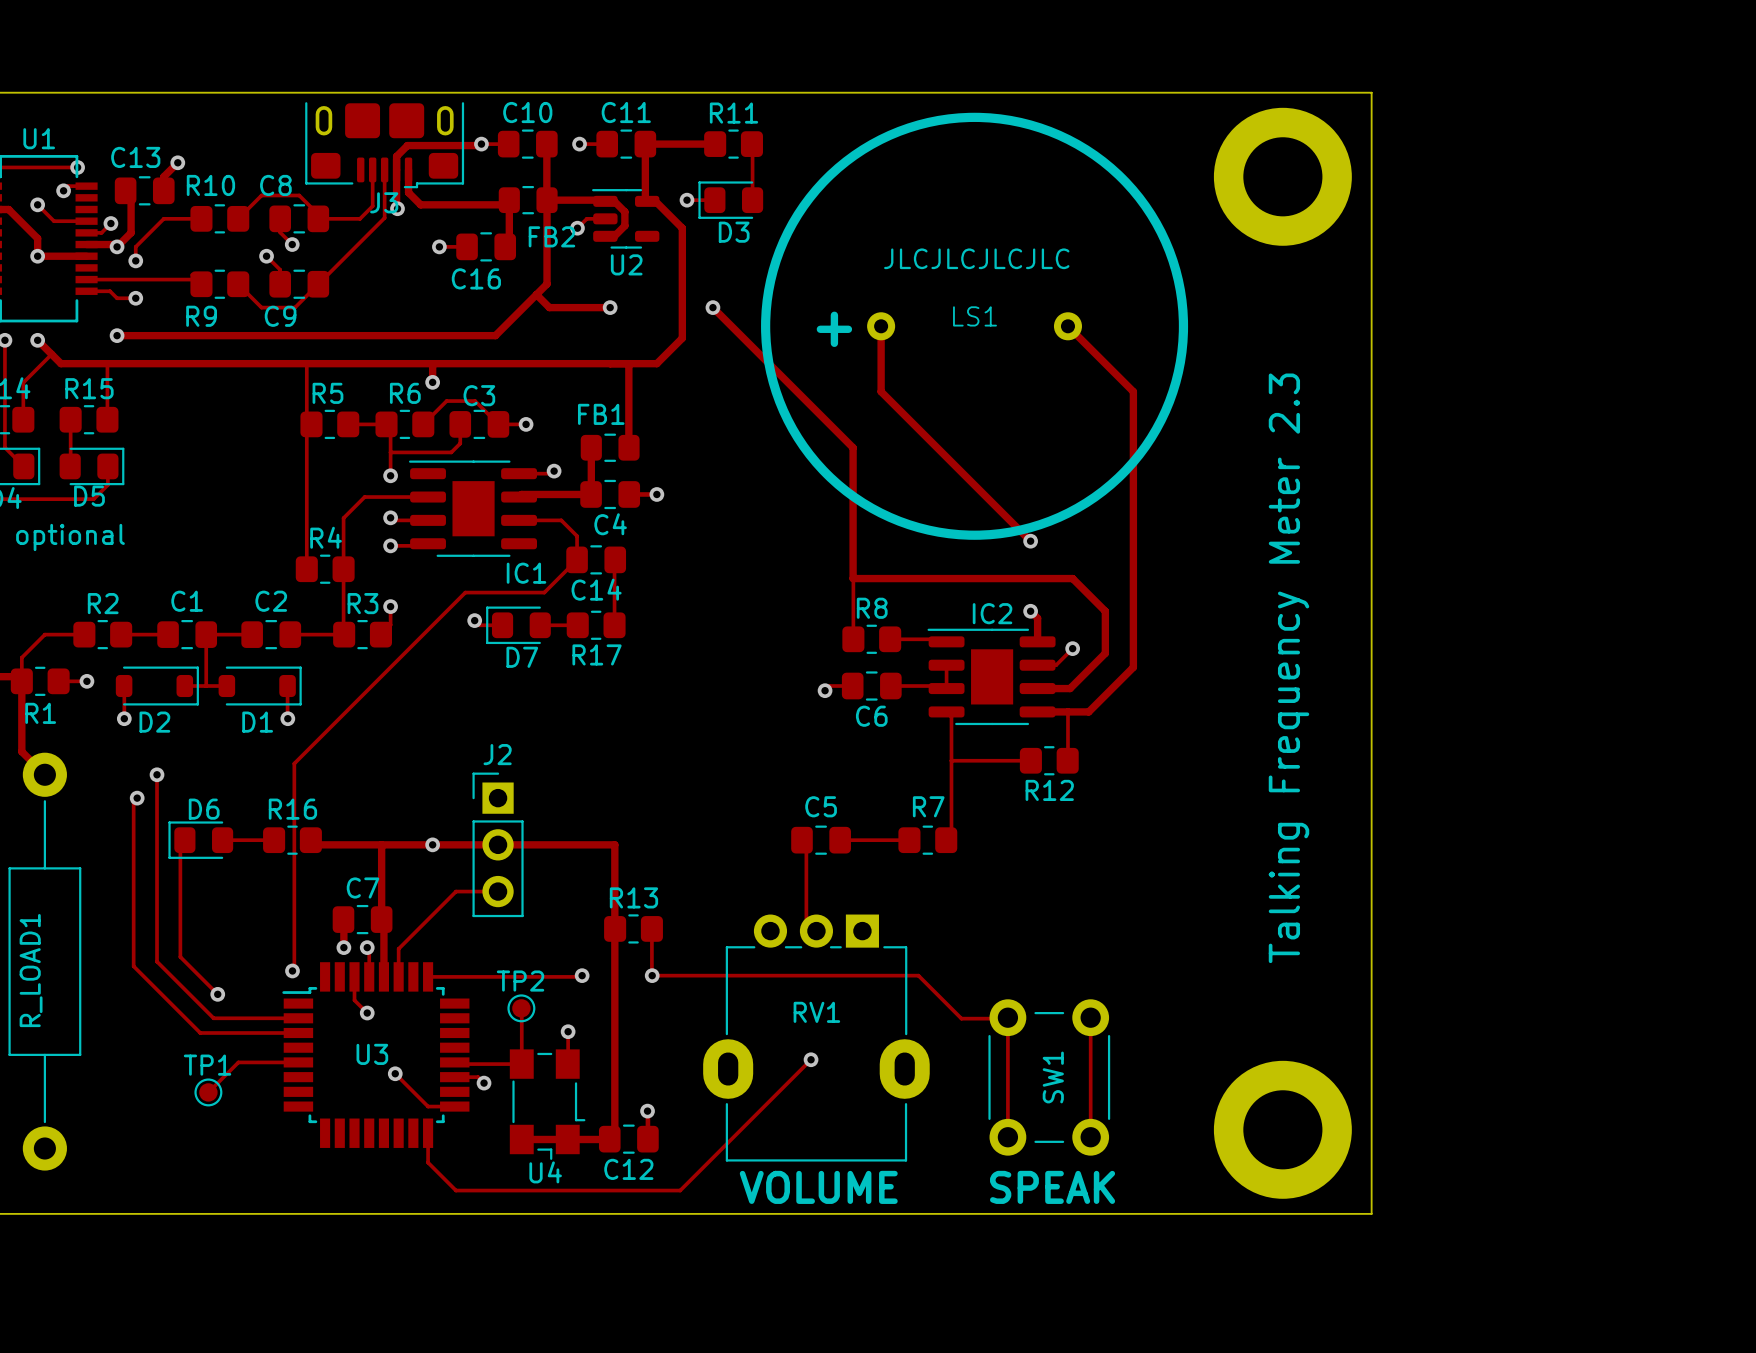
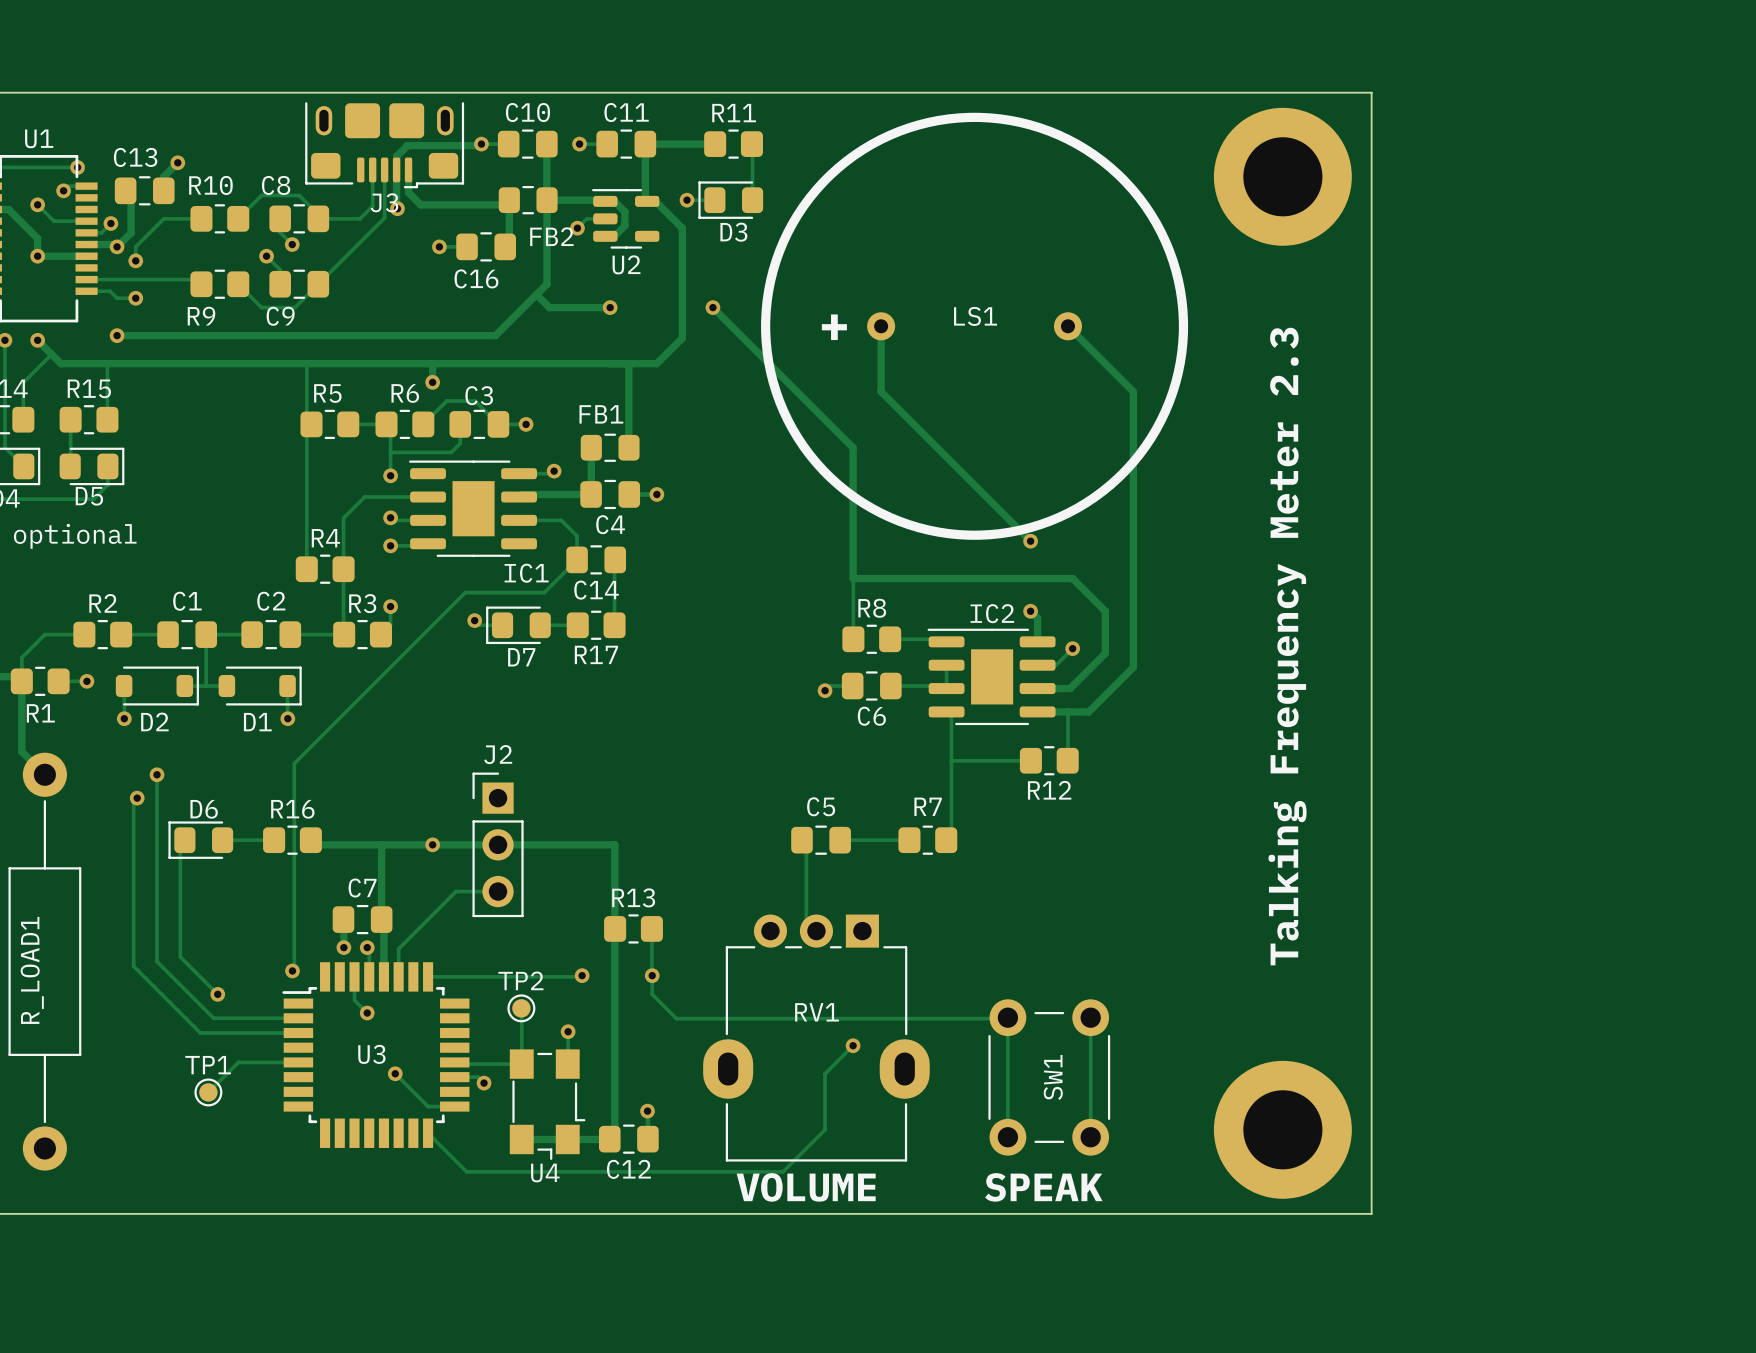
text: JLCJLCJLCJLC (976, 258) -> none
track: (652, 975) (918, 975) (961, 1018) -> (652, 975) (652, 994) (676, 1018) (961, 1018)
track: (811, 1059) (680, 1190) (456, 1190) (428, 1162) (428, 1133) -> (853, 1045) (825, 1073) (825, 1129) (783, 1171) (466, 1171) (428, 1133)
via position: (811, 1059) -> (853, 1045)

